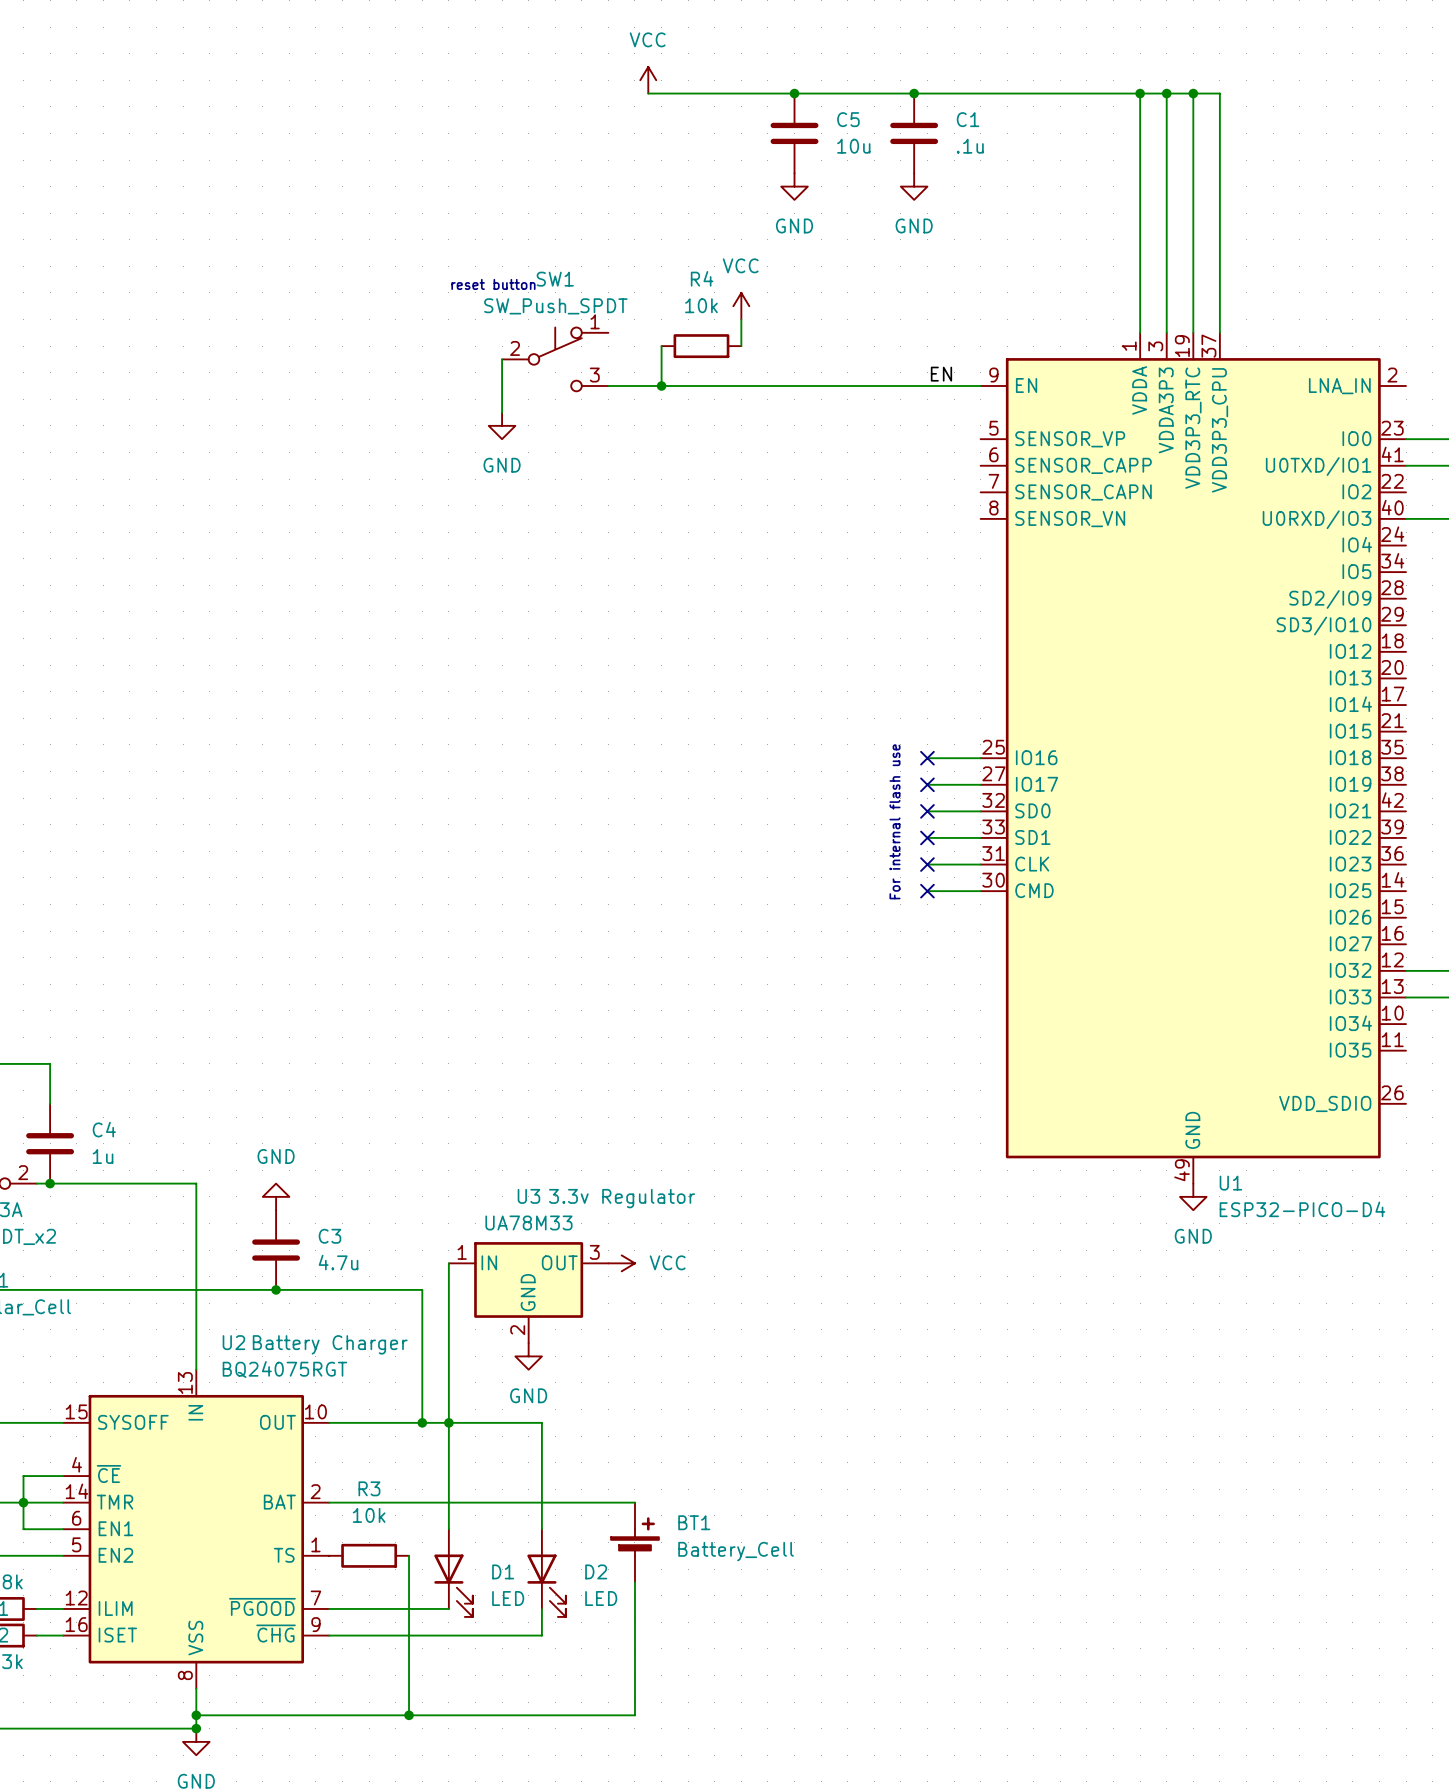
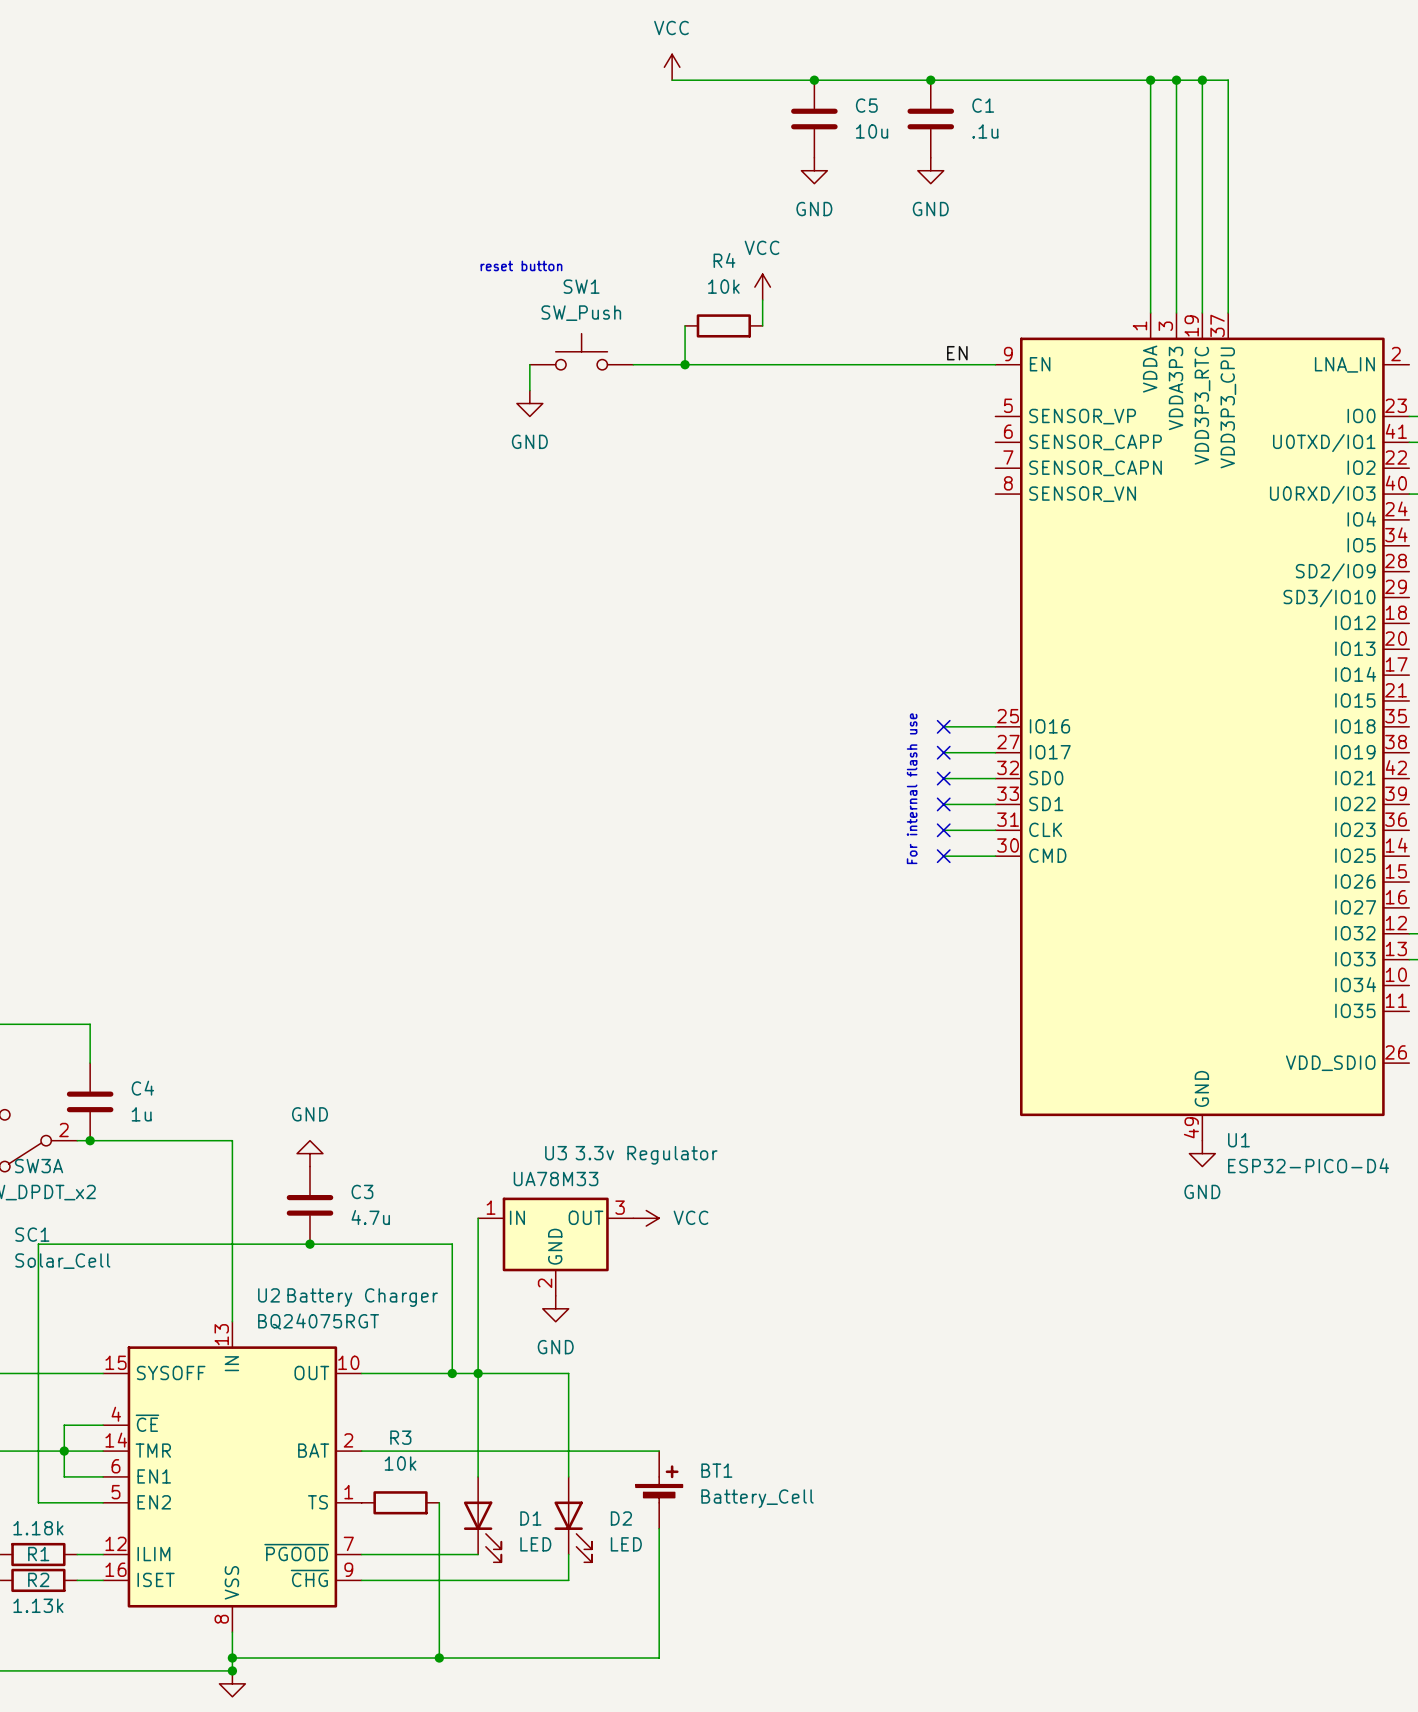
SW1 value: SW_Push_SPDT (555, 306) -> SW_Push (581, 313)
SW1 symbol: [502, 327, 609, 392] -> [529, 333, 634, 370]
wire: (502, 359) (502, 385) -> none

